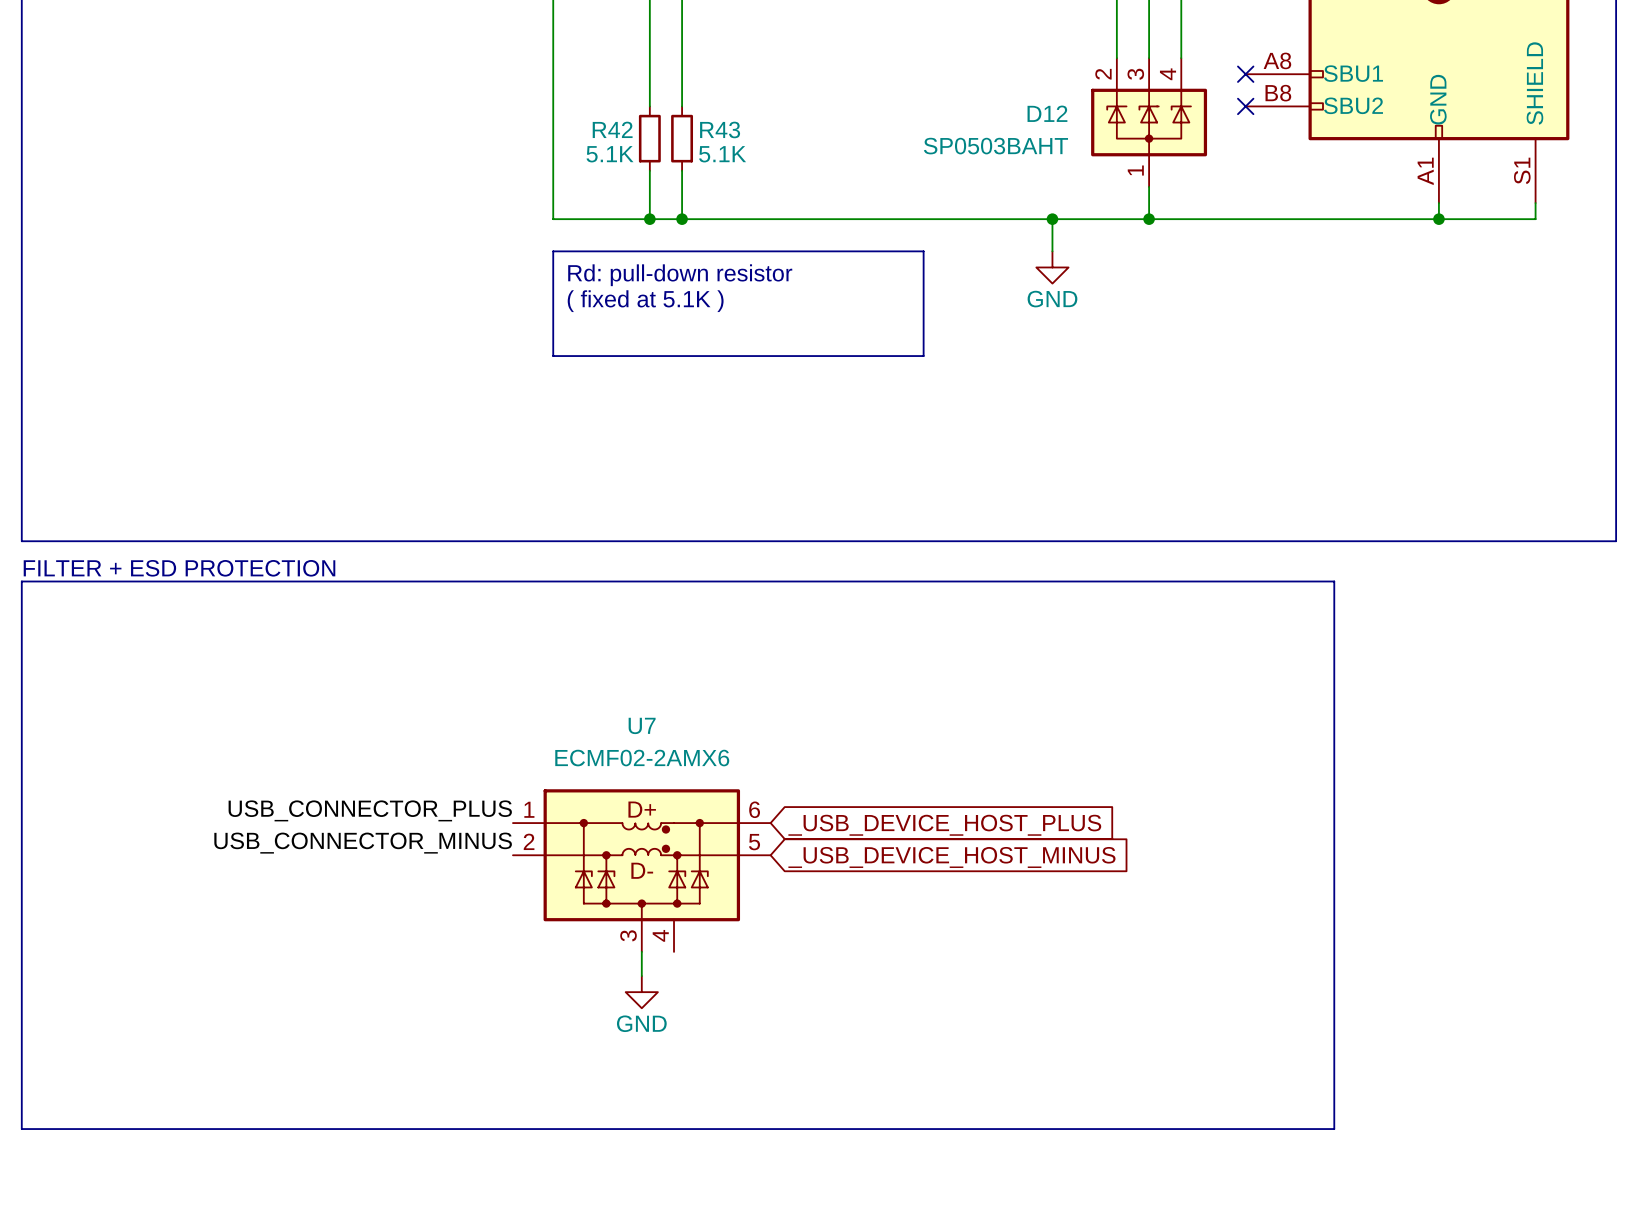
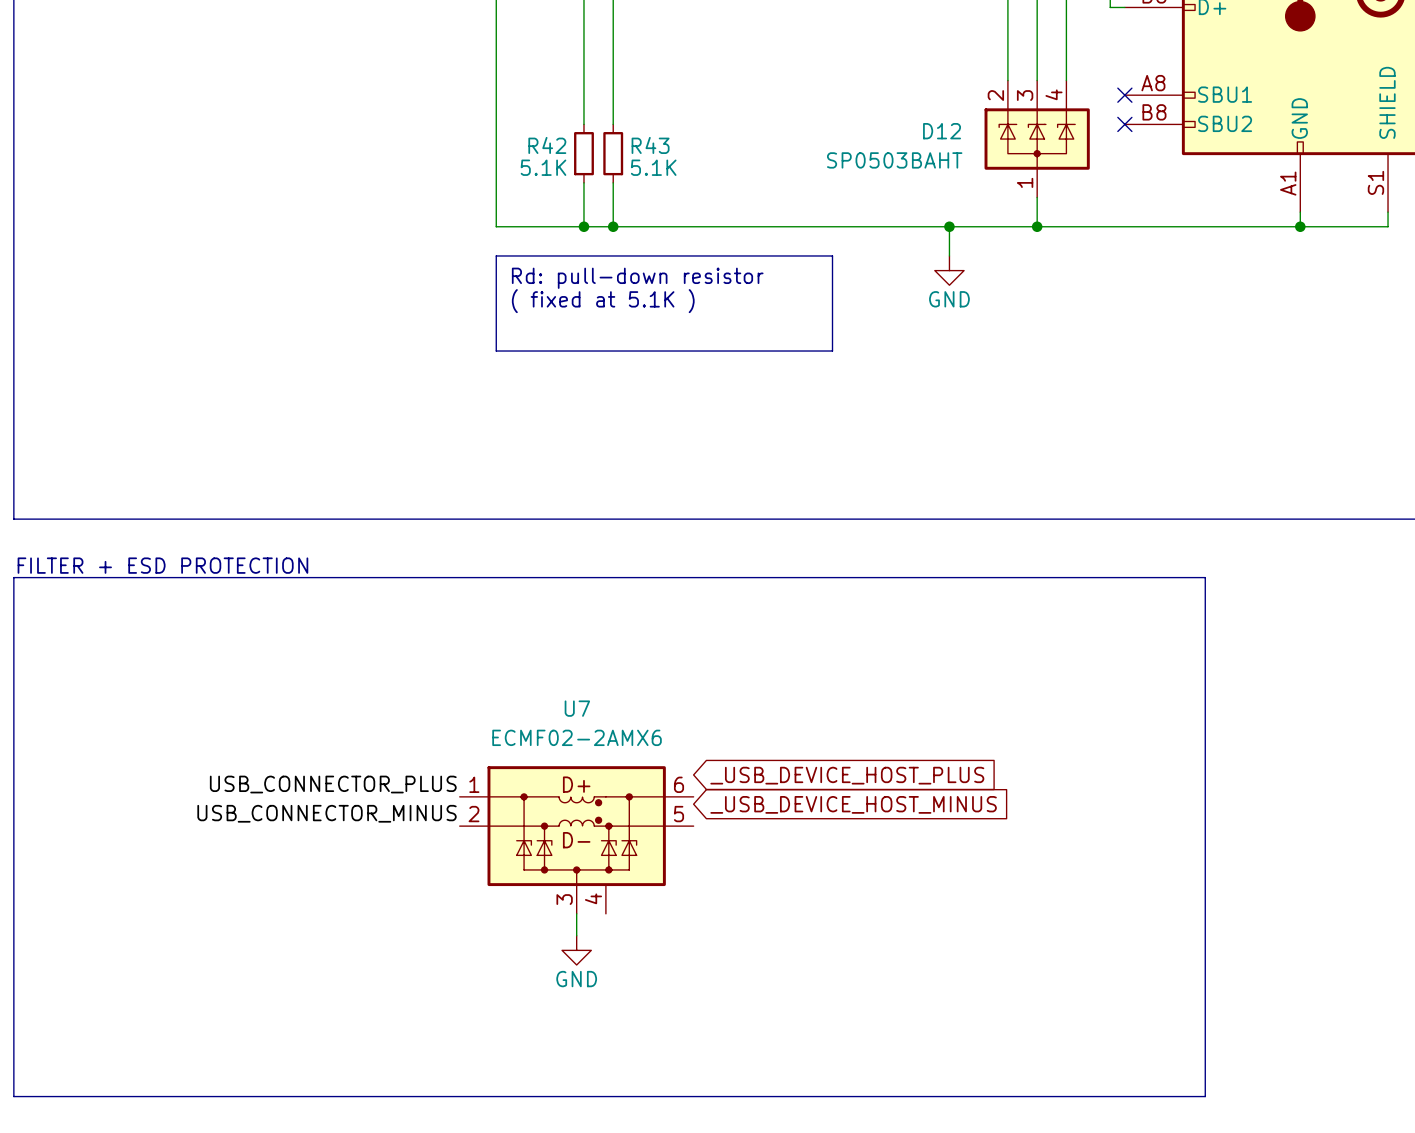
text position: FILTER + ESD PROTECTION (179, 568) -> FILTER + ESD PROTECTION (162, 565)
line: (21, 605) (21, 581) (1334, 581) (1334, 605) -> (13, 577) (1205, 577)
label position: USB_CONNECTOR_PLUS (370, 810) -> USB_CONNECTOR_PLUS (333, 784)
label position: USB_CONNECTOR_MINUS (363, 843) -> USB_CONNECTOR_MINUS (327, 813)
U7 position: (641, 870) -> (576, 840)
power symbol position: GND (641, 992) -> GND (576, 950)
line: (21, 1129) (1334, 1129) -> (13, 1052) (13, 1096) (1205, 1096) (1205, 1052)

